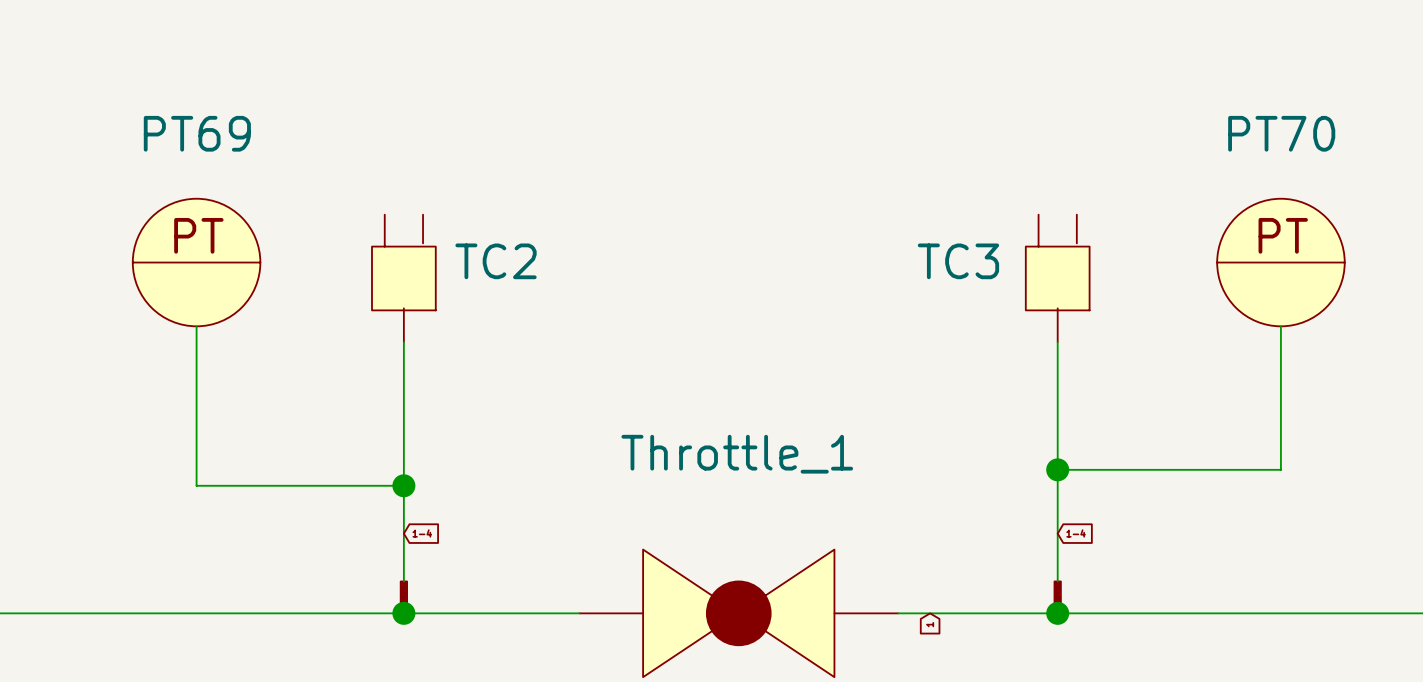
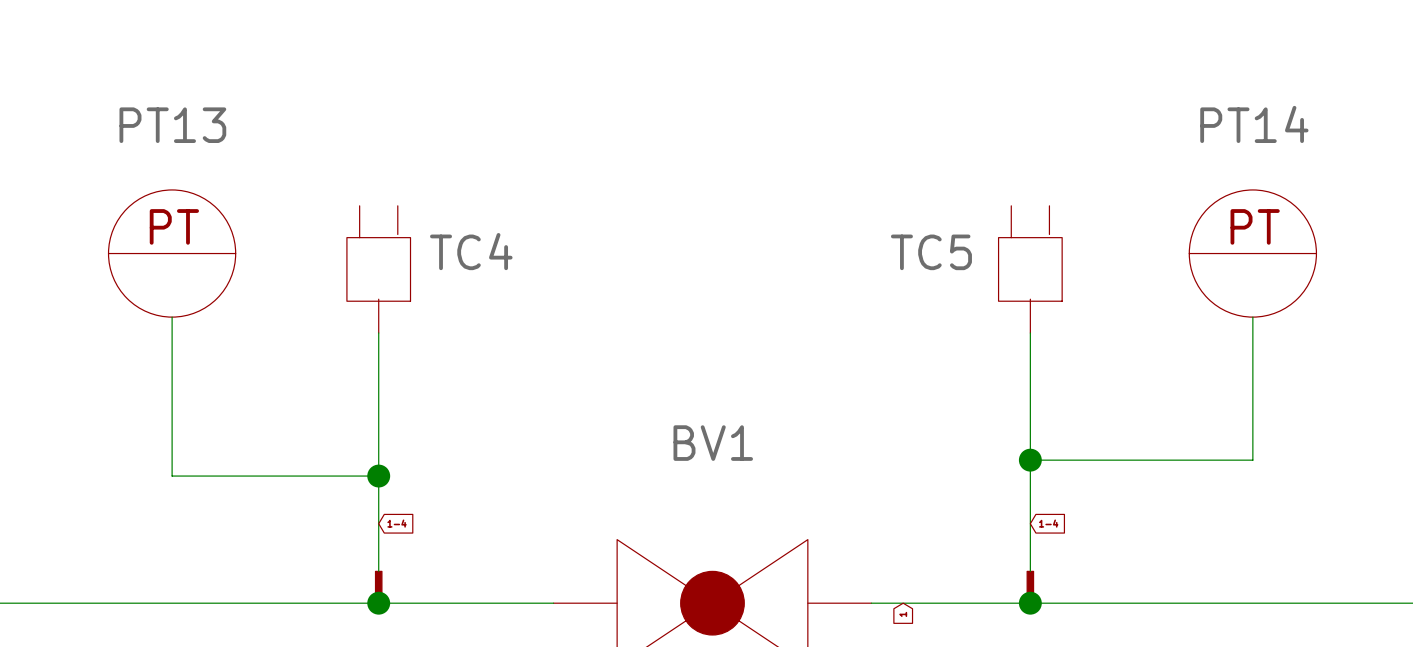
PT69 name: PT69 (197, 133) -> PT13 (172, 125)
PT70 name: PT70 (1281, 133) -> PT14 (1254, 124)
TC2 name: TC2 (496, 261) -> TC4 (471, 251)
TC3 name: TC3 (958, 261) -> TC5 (931, 252)
Throttle_1 name: Throttle_1 (737, 454) -> BV1 (713, 443)

